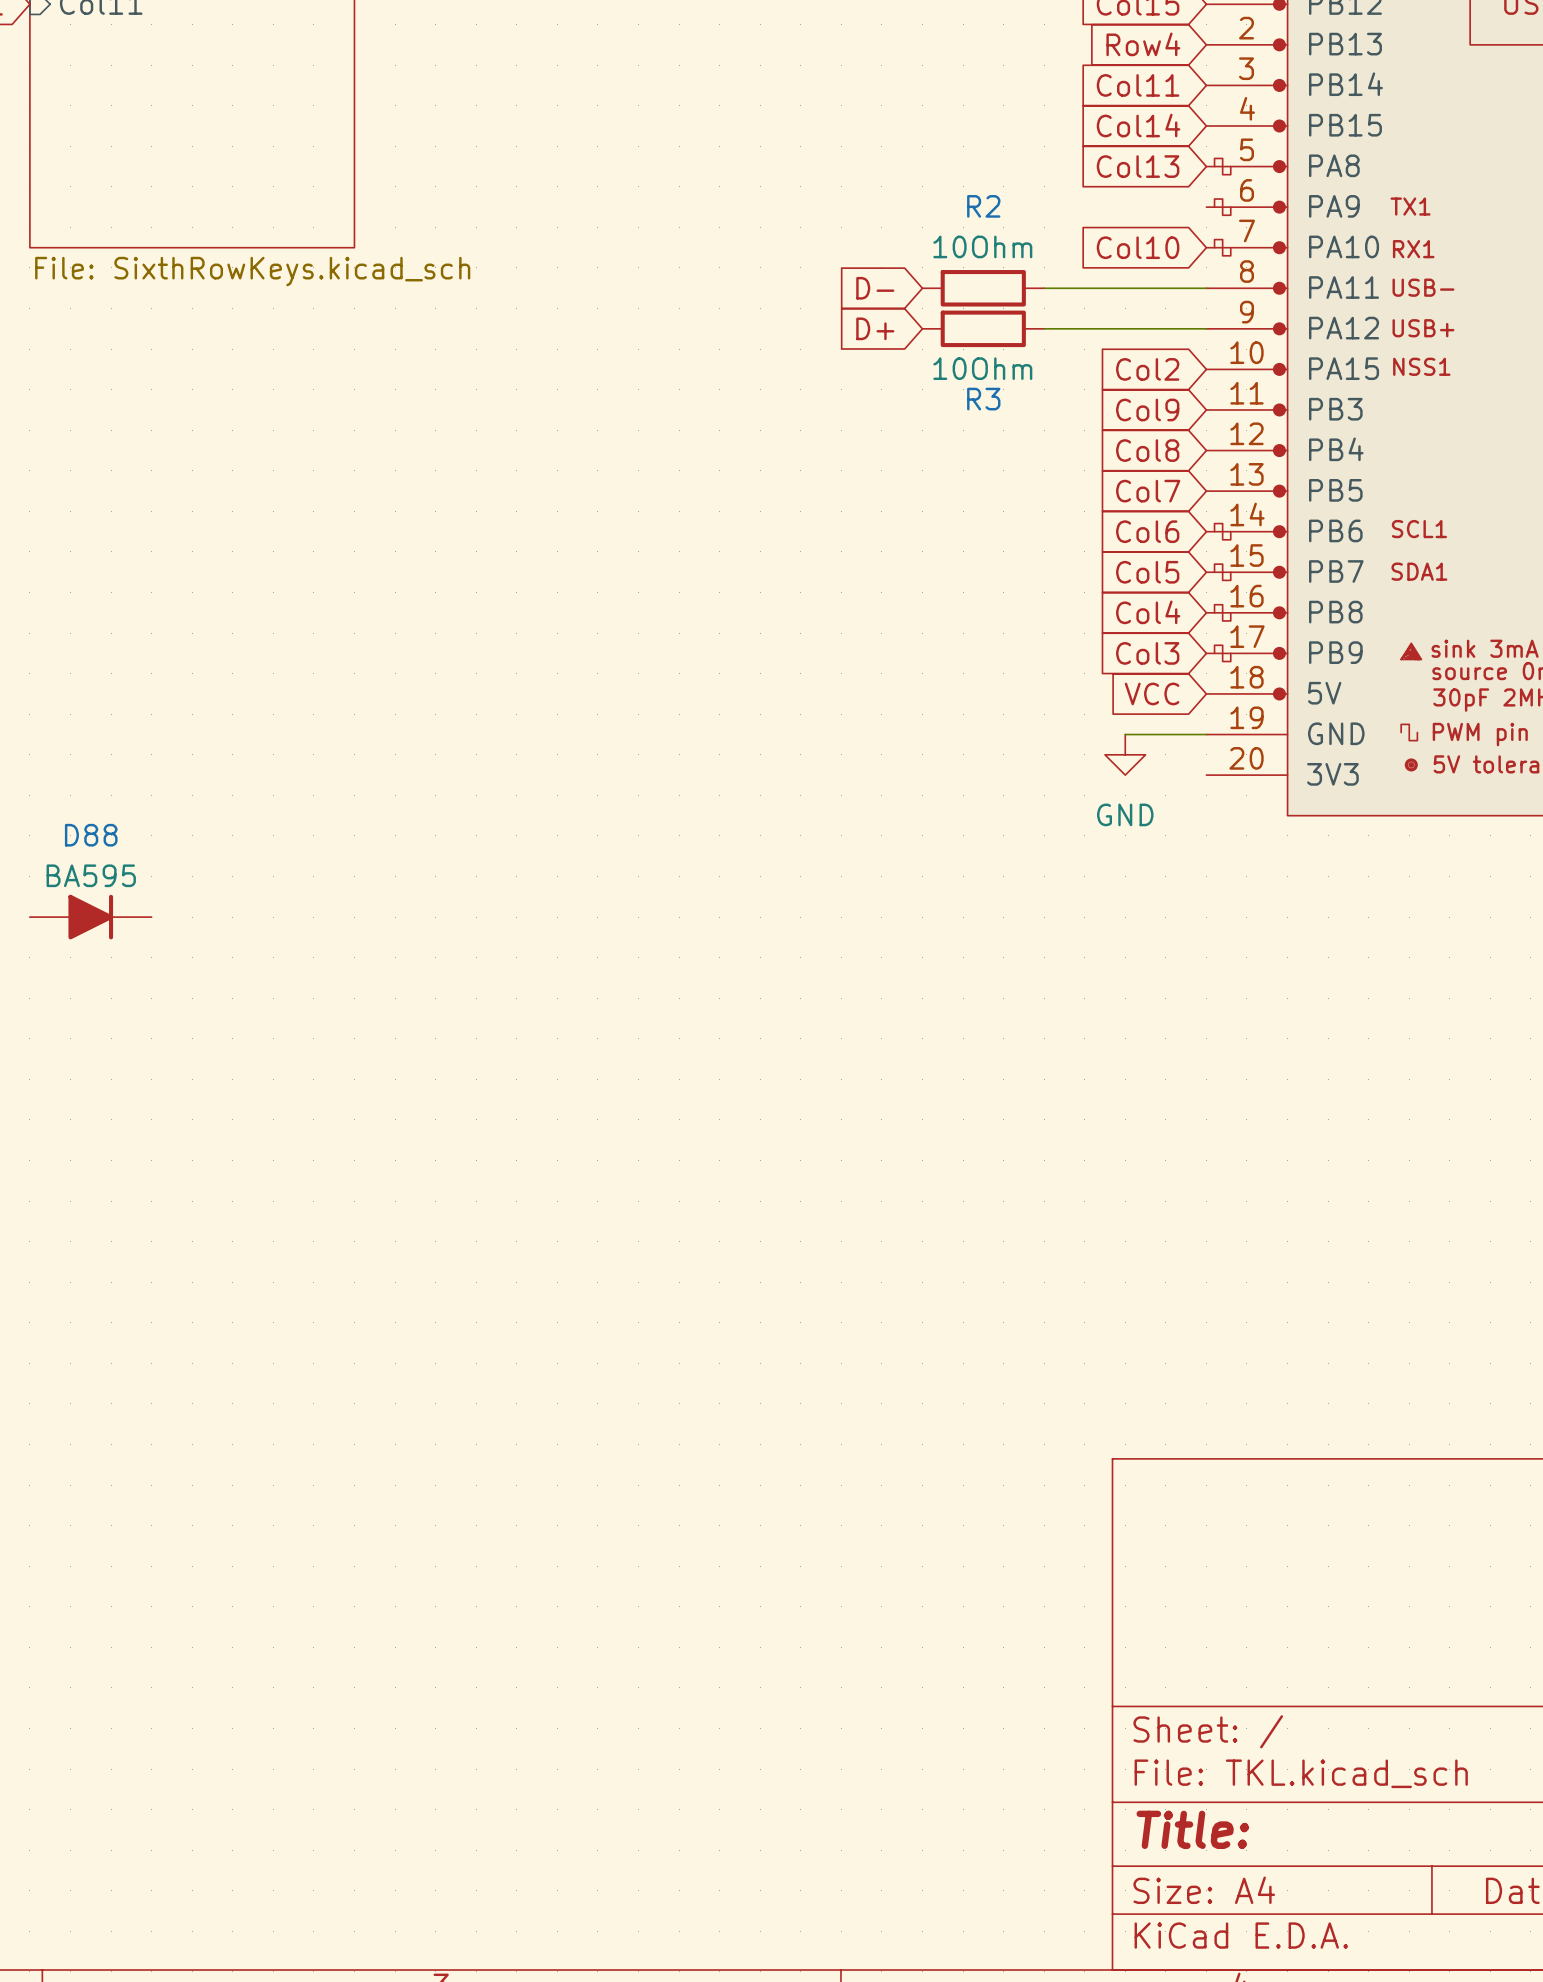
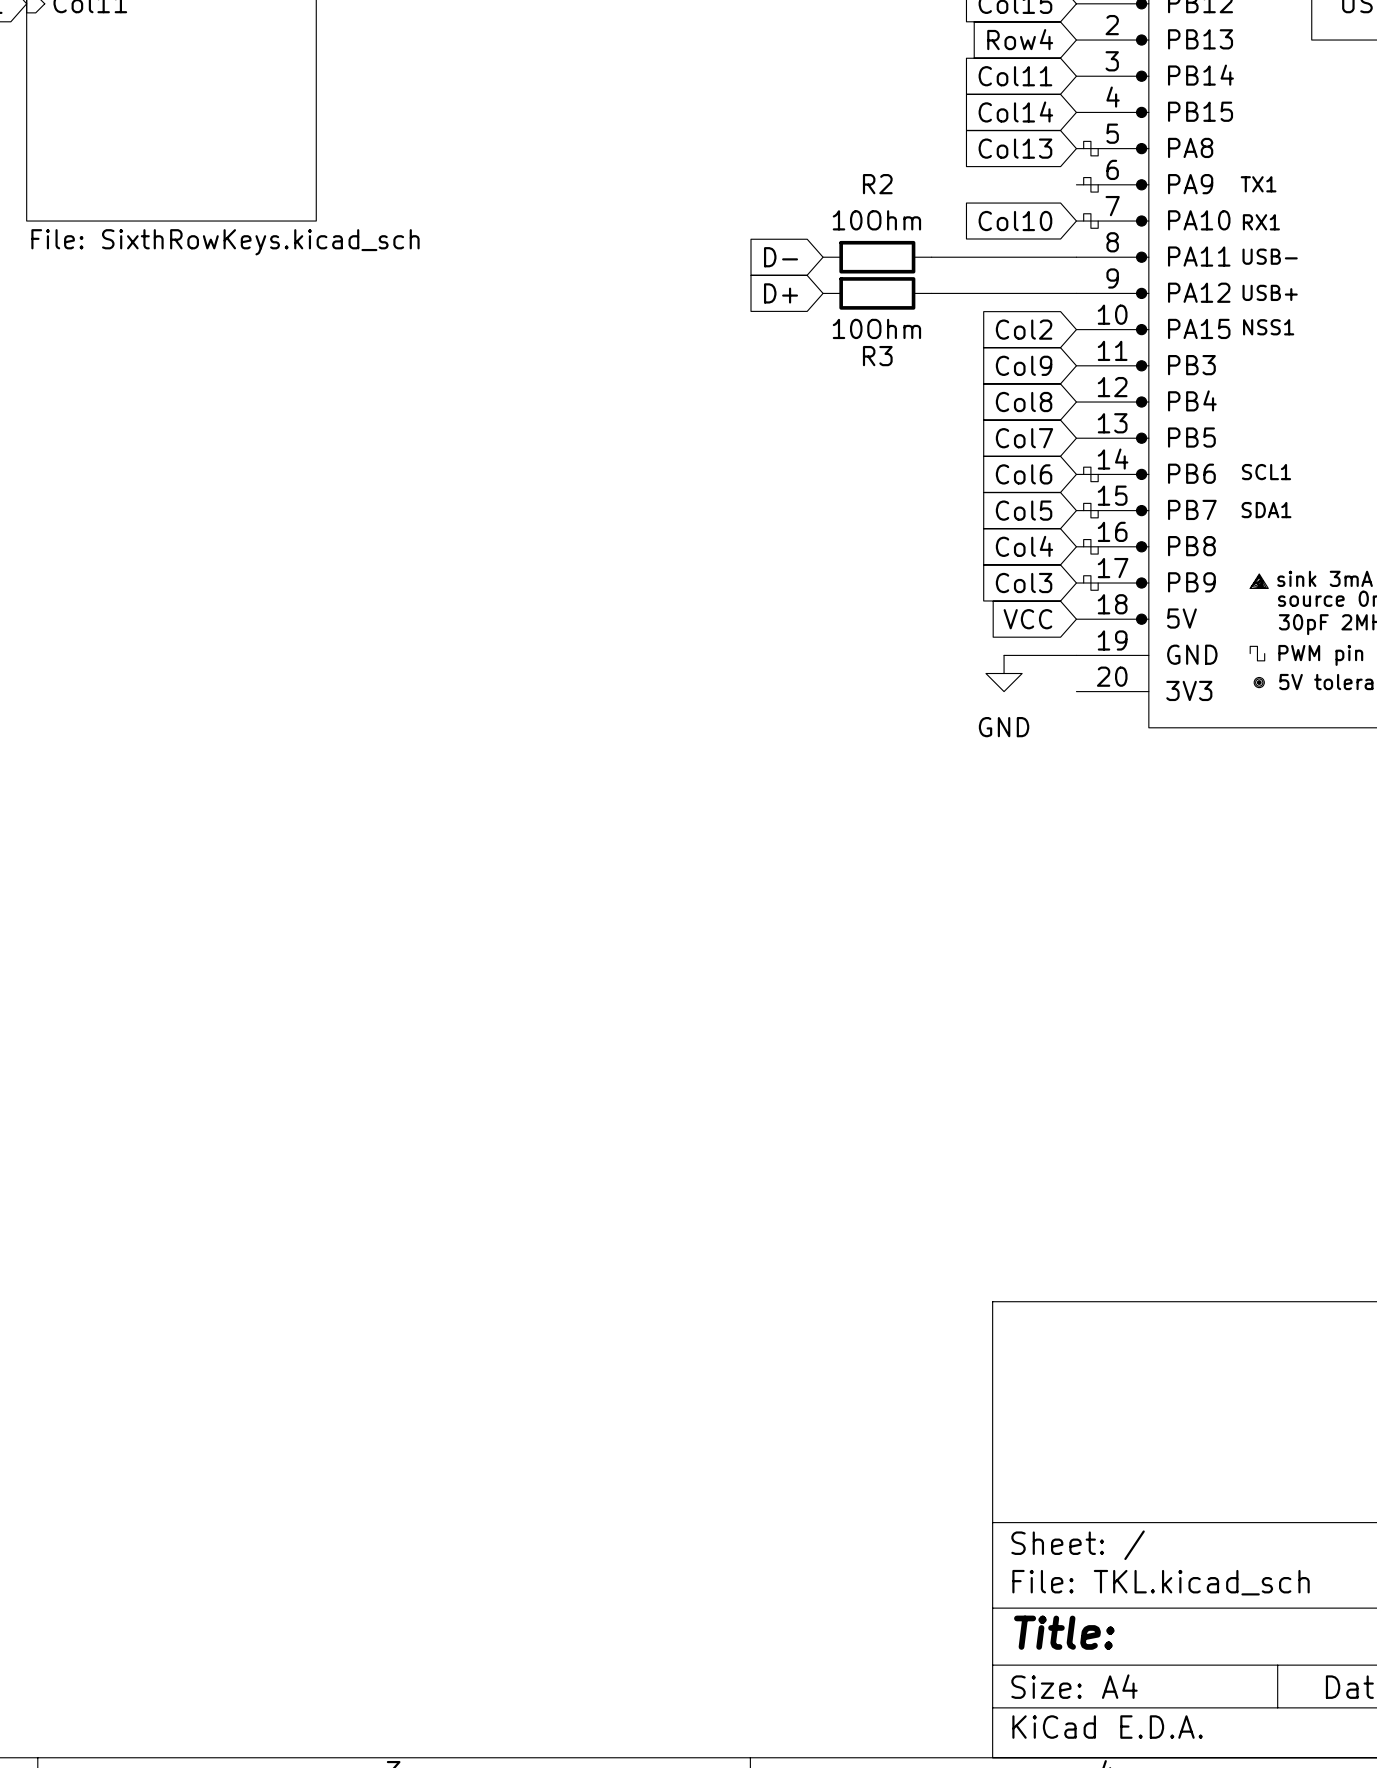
D88: BA595 (90, 917) -> none

